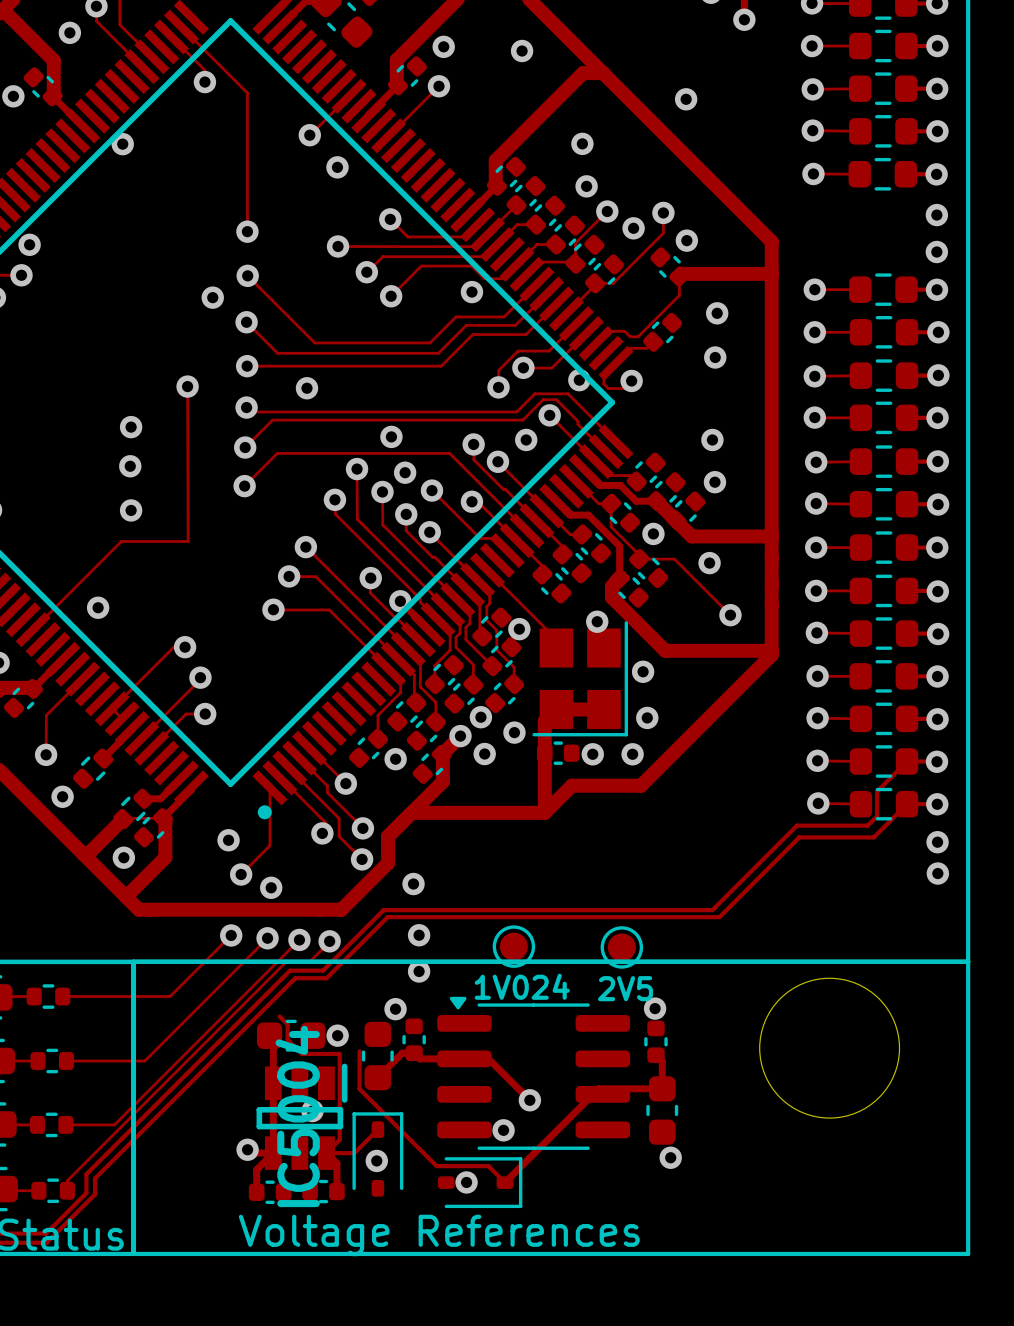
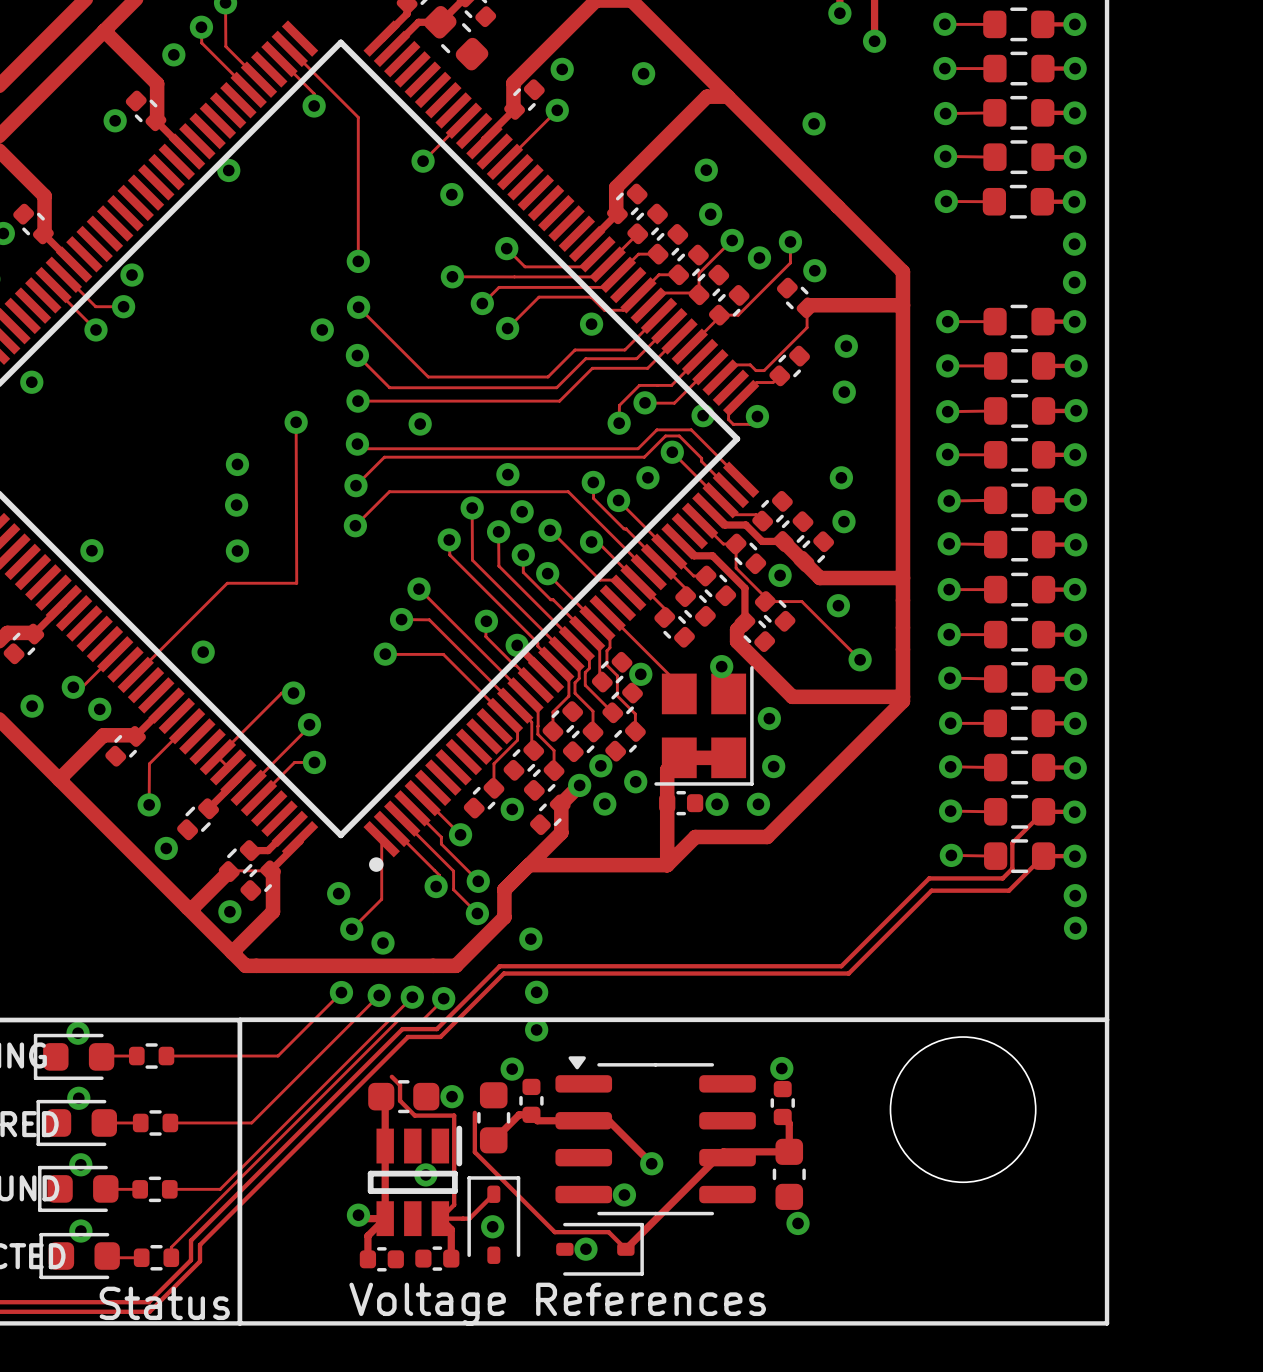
part: (513, 946) -> none
part: (621, 947) -> none
text: 1V024 (522, 986) -> none
text: 2V5 (625, 988) -> none
IC5004 name: IC5004 (297, 1116) -> none

